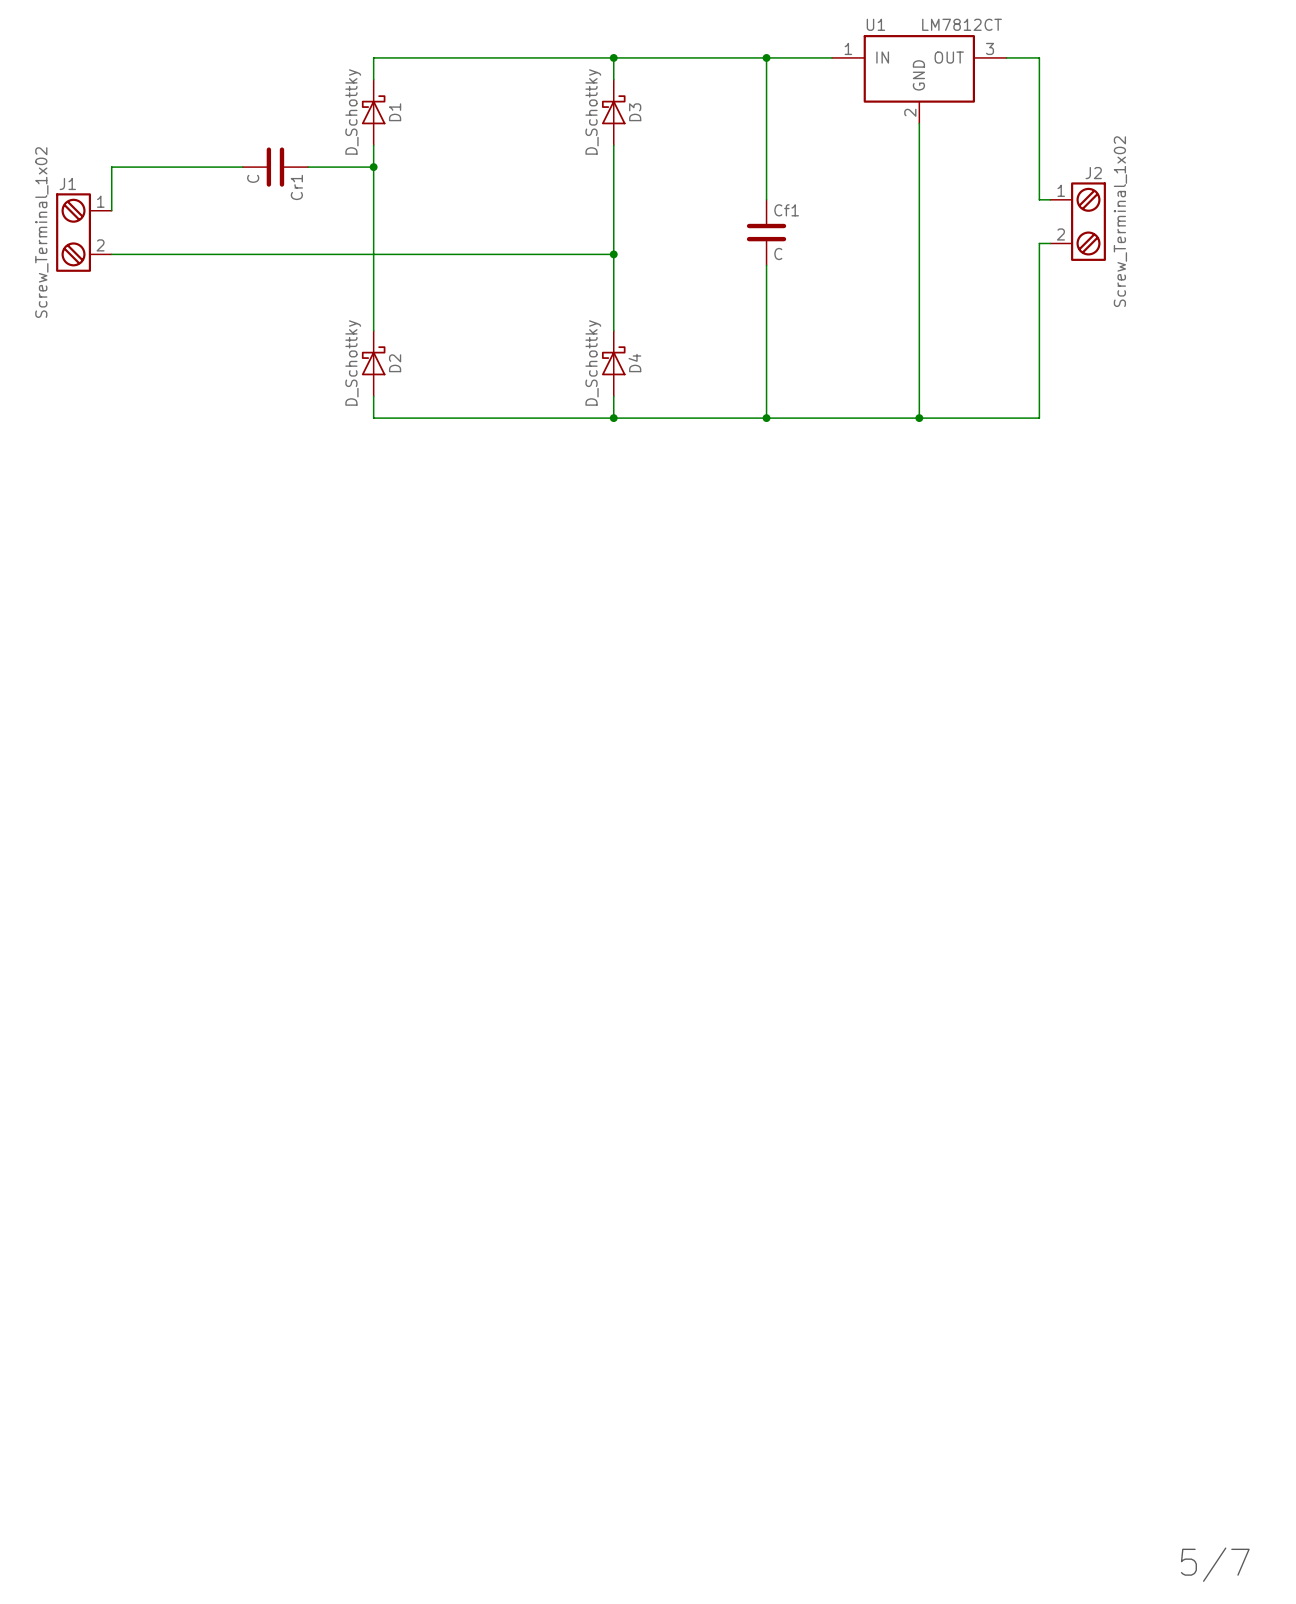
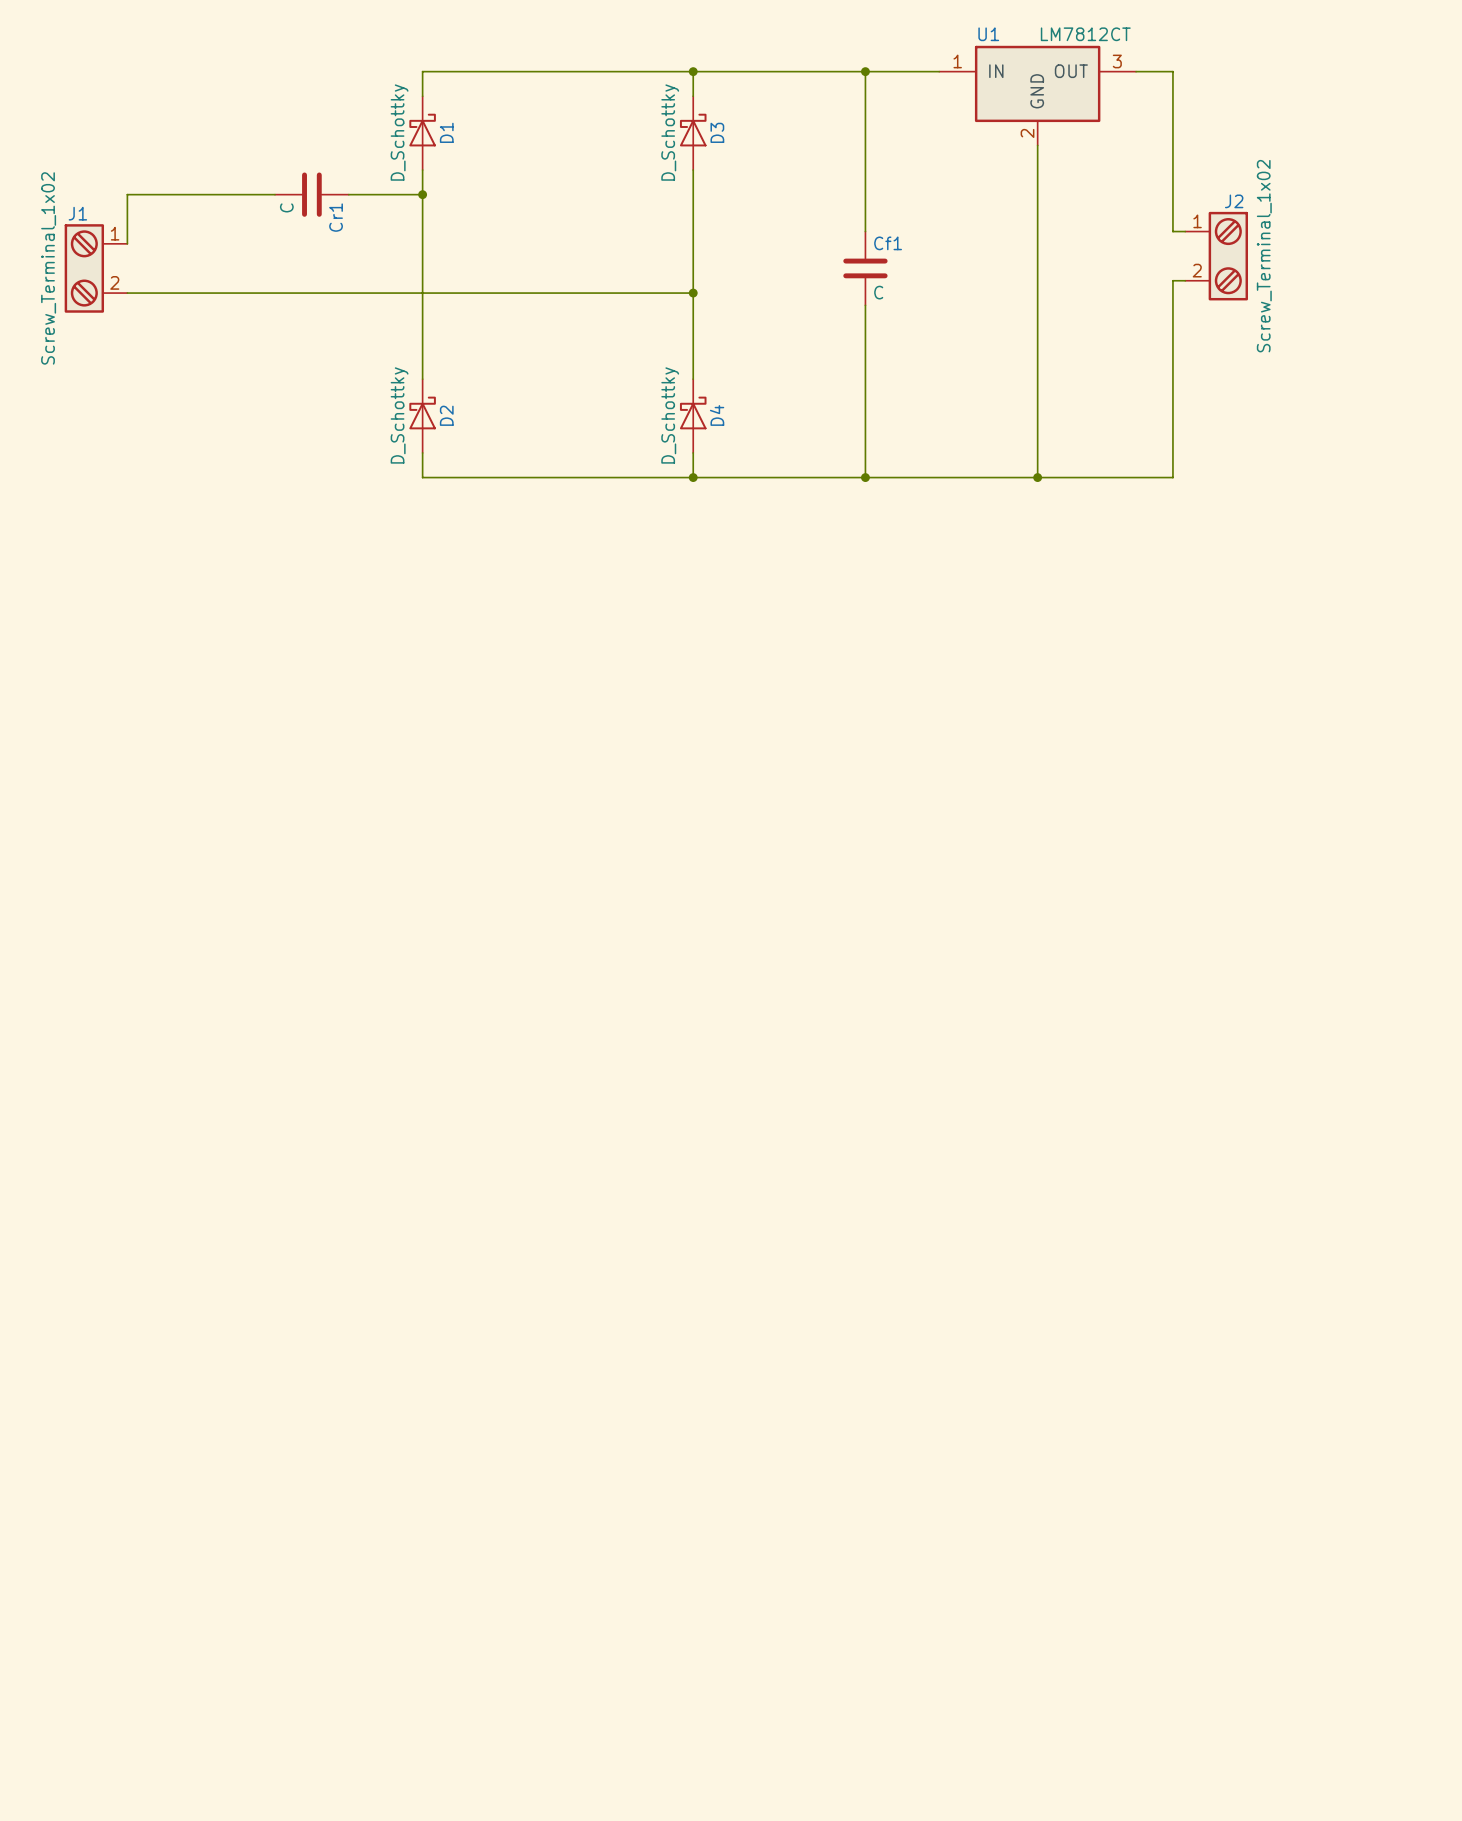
text: 5/7 (1215, 1564) -> none

